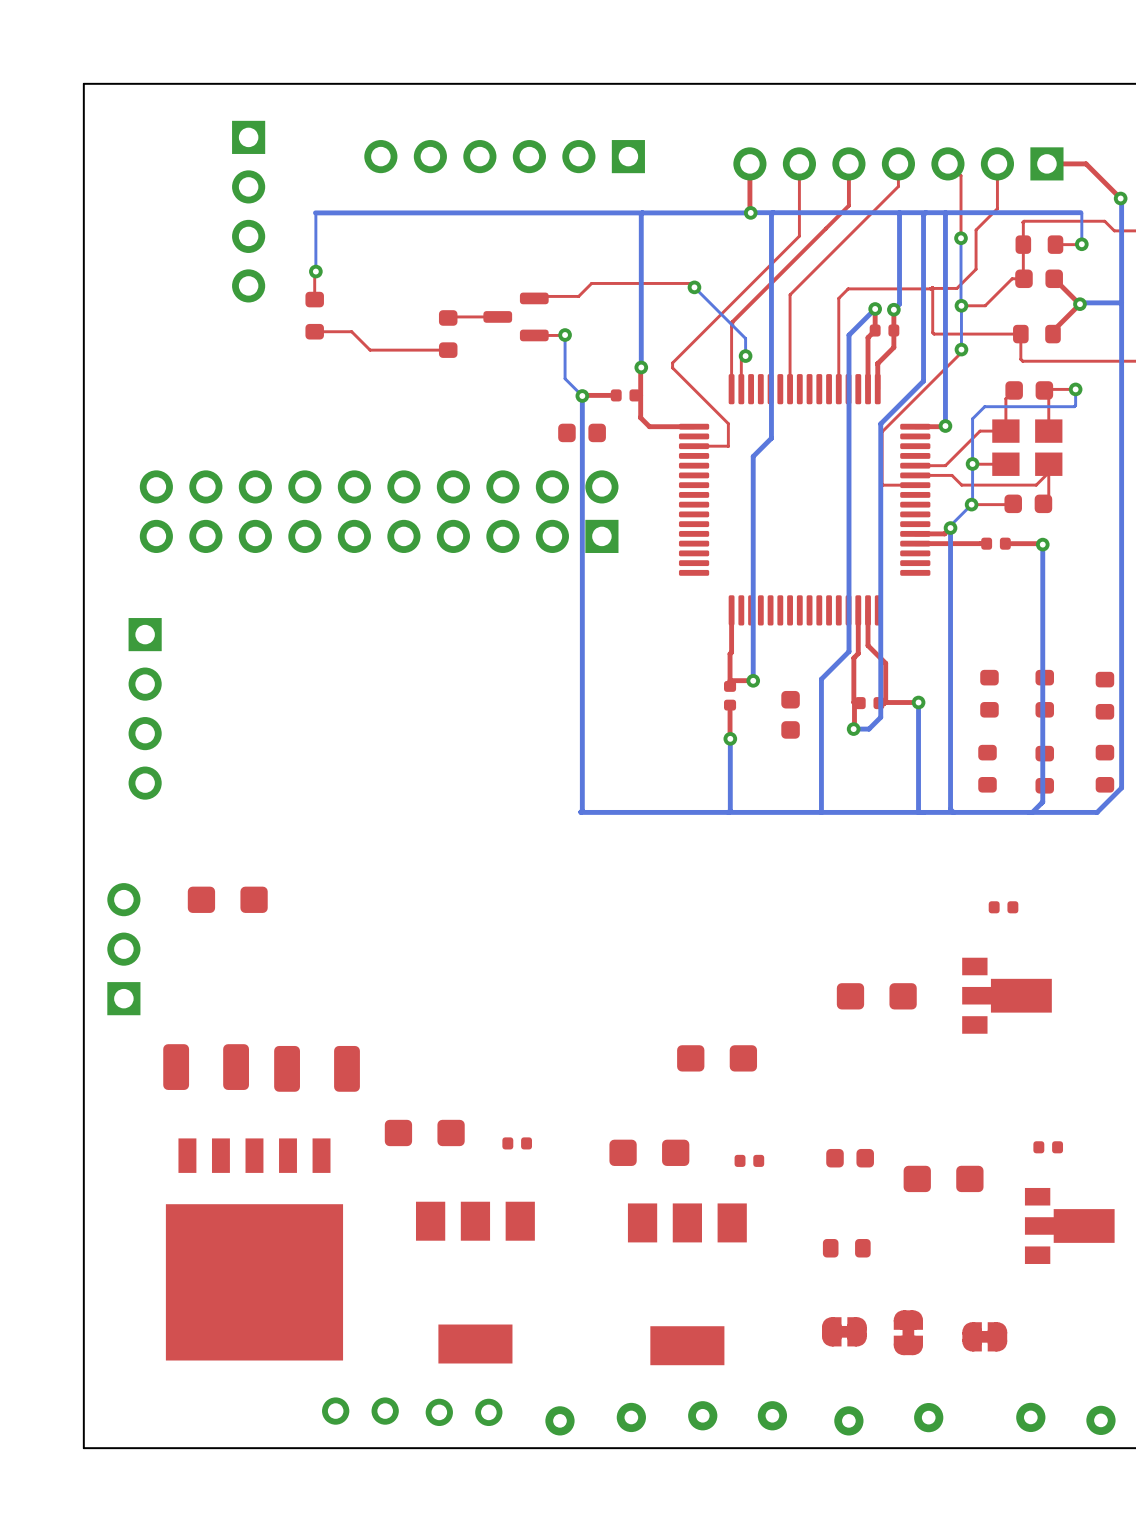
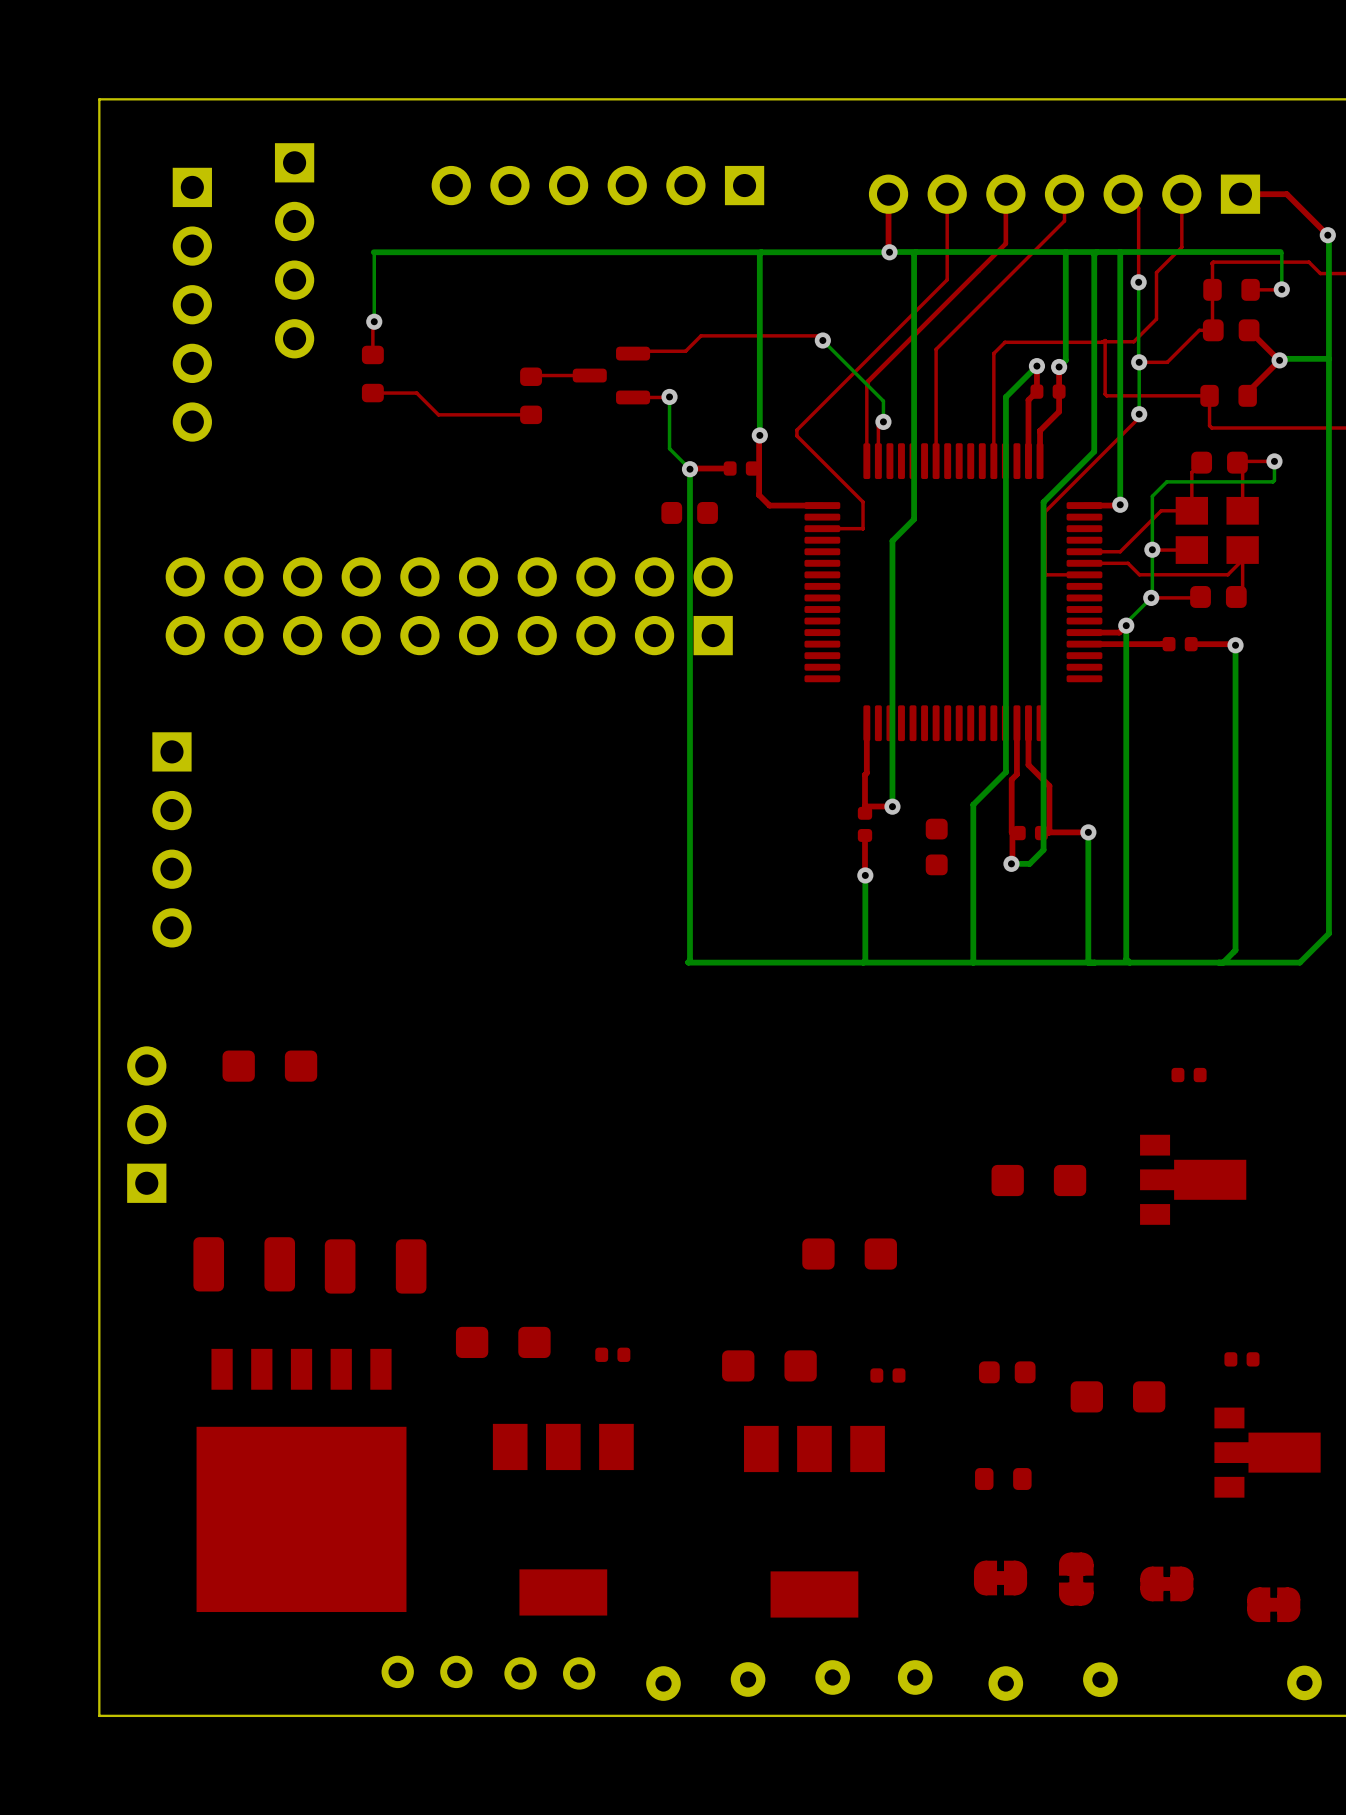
part: none -> (192, 304)
part: (989, 693) -> none
part: (1044, 693) -> none
part: (1104, 695) -> none
part: (987, 768) -> none
part: (1104, 768) -> none
part: (1044, 769) -> none
part: none -> (1273, 1604)
part: (1030, 1417) -> none

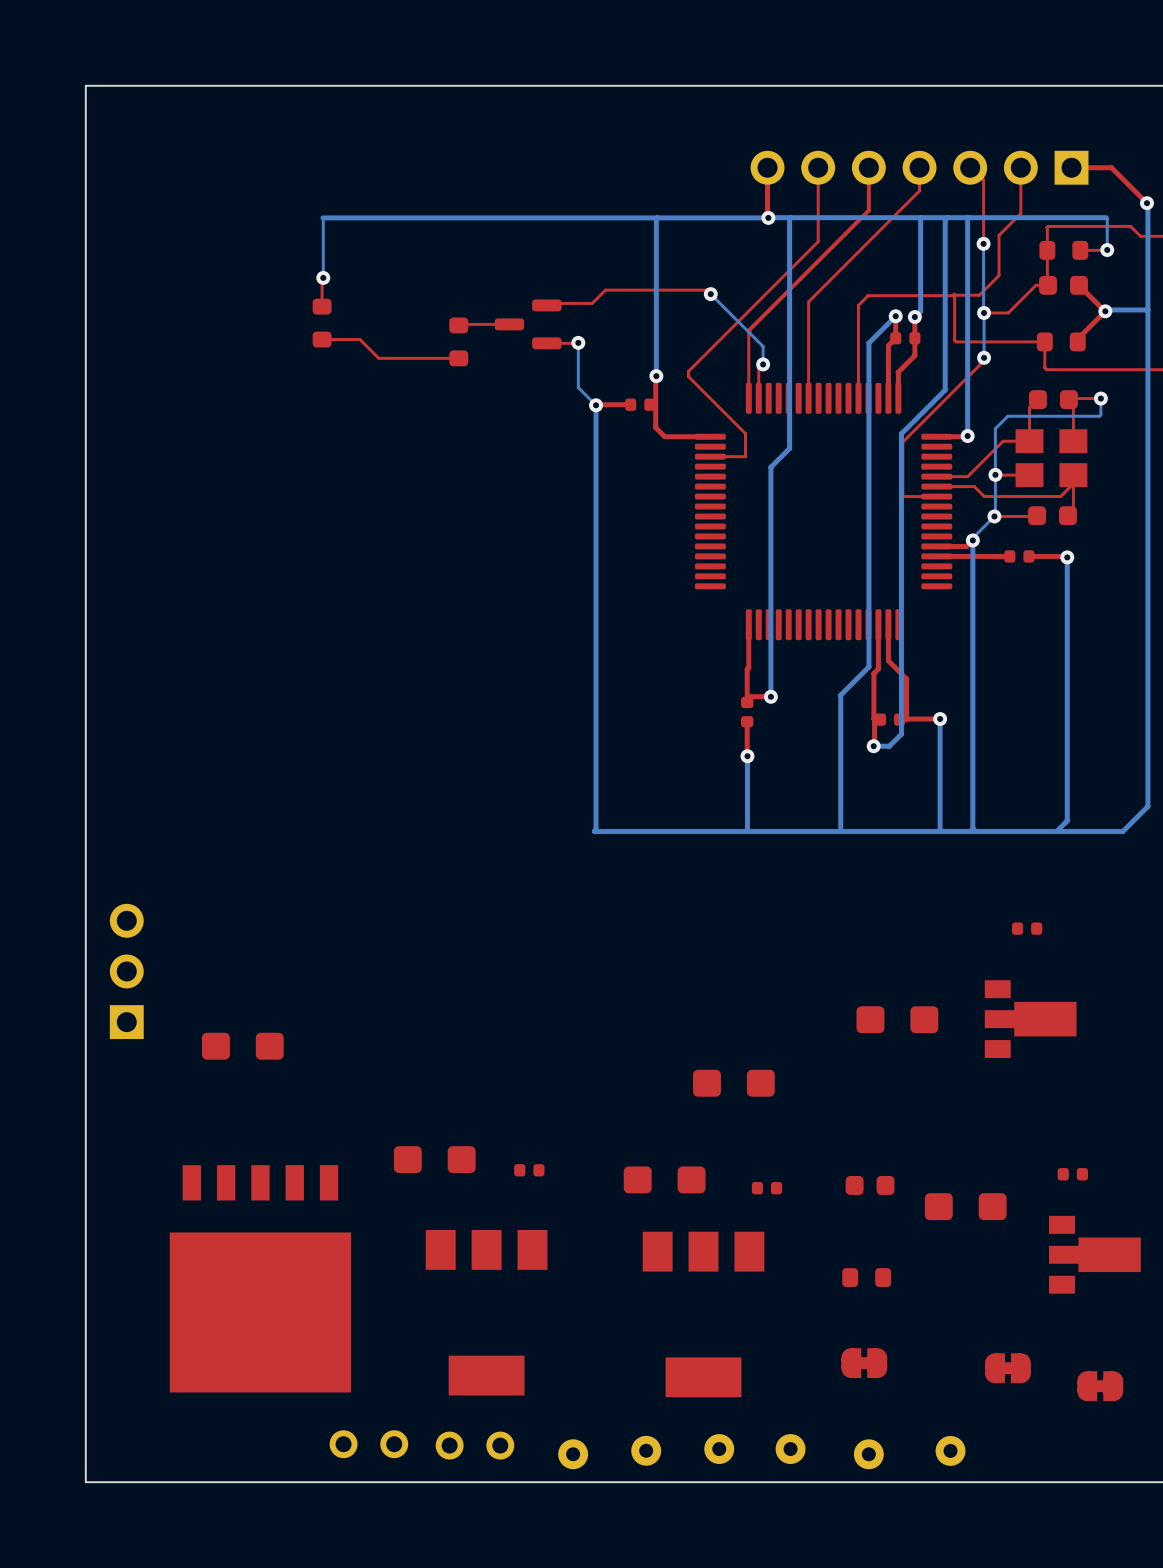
part: (597, 185) -> none
part: (294, 250) -> none
part: (192, 304) -> none
part: (689, 512) -> none
part: (449, 606) -> none
part: (171, 839) -> none
part: (936, 846) -> none
part position: (269, 1066) -> (242, 1046)
part: (244, 1264) -> none
part: (375, 1266) -> none
part: (1076, 1579) -> none
part: (1304, 1682) -> none

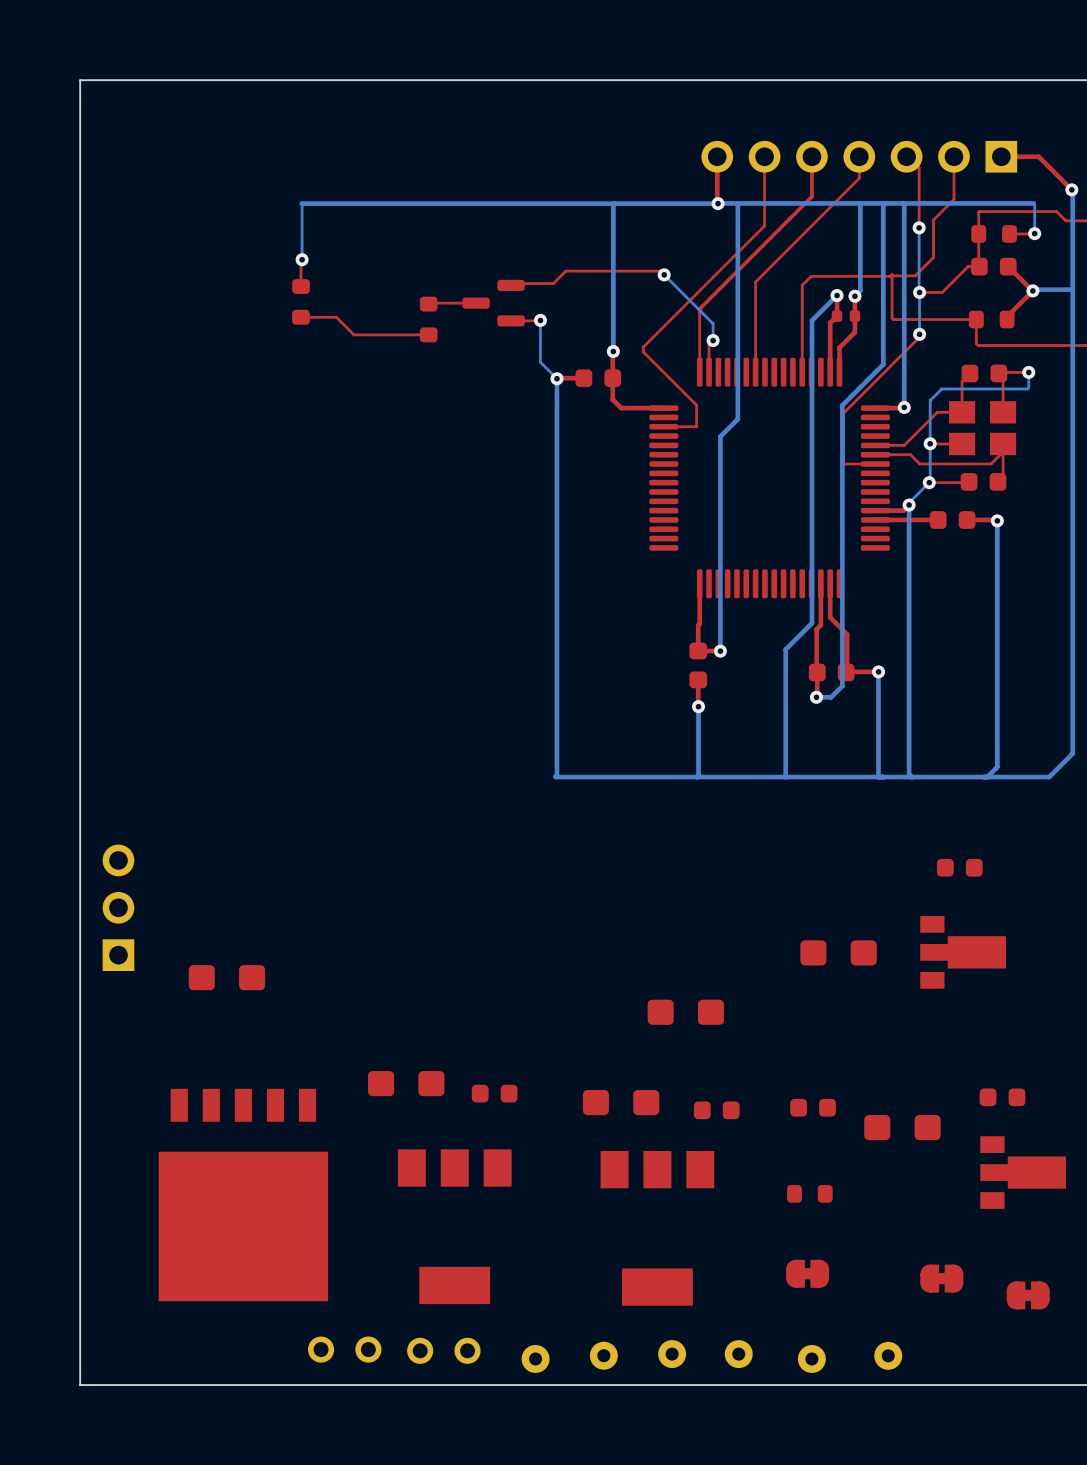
part footprint: [625, 398, 656, 411] -> [575, 369, 622, 388]
part footprint: [1004, 550, 1035, 563] -> [929, 511, 976, 529]
part footprint: [741, 696, 754, 728] -> [689, 642, 708, 689]
part footprint: [874, 713, 906, 726] -> [808, 663, 855, 682]
part footprint: [1011, 922, 1043, 935] -> [936, 858, 983, 877]
part footprint: [514, 1164, 545, 1177] -> [471, 1084, 518, 1103]
part footprint: [1057, 1168, 1088, 1181] -> [979, 1088, 1026, 1107]
part footprint: [751, 1181, 783, 1195] -> [693, 1101, 740, 1120]

